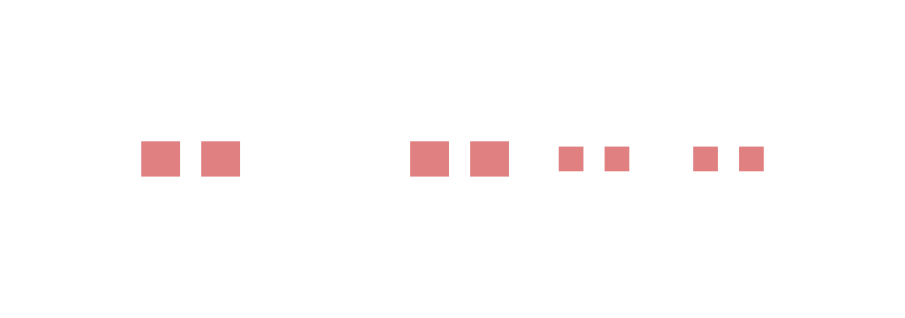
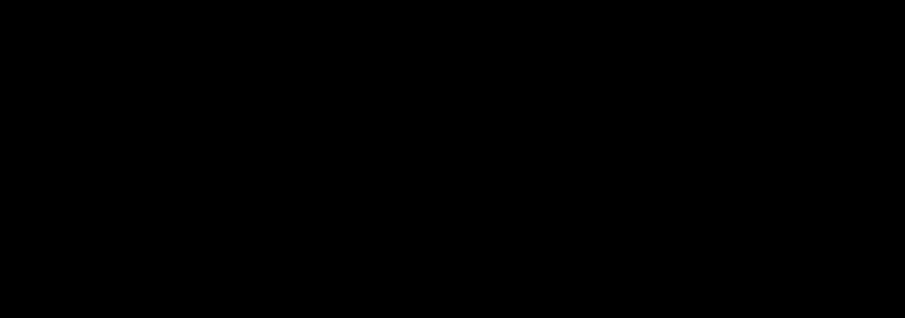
part: (190, 158) -> none
part: (459, 158) -> none
part: (594, 158) -> none
part: (728, 158) -> none

